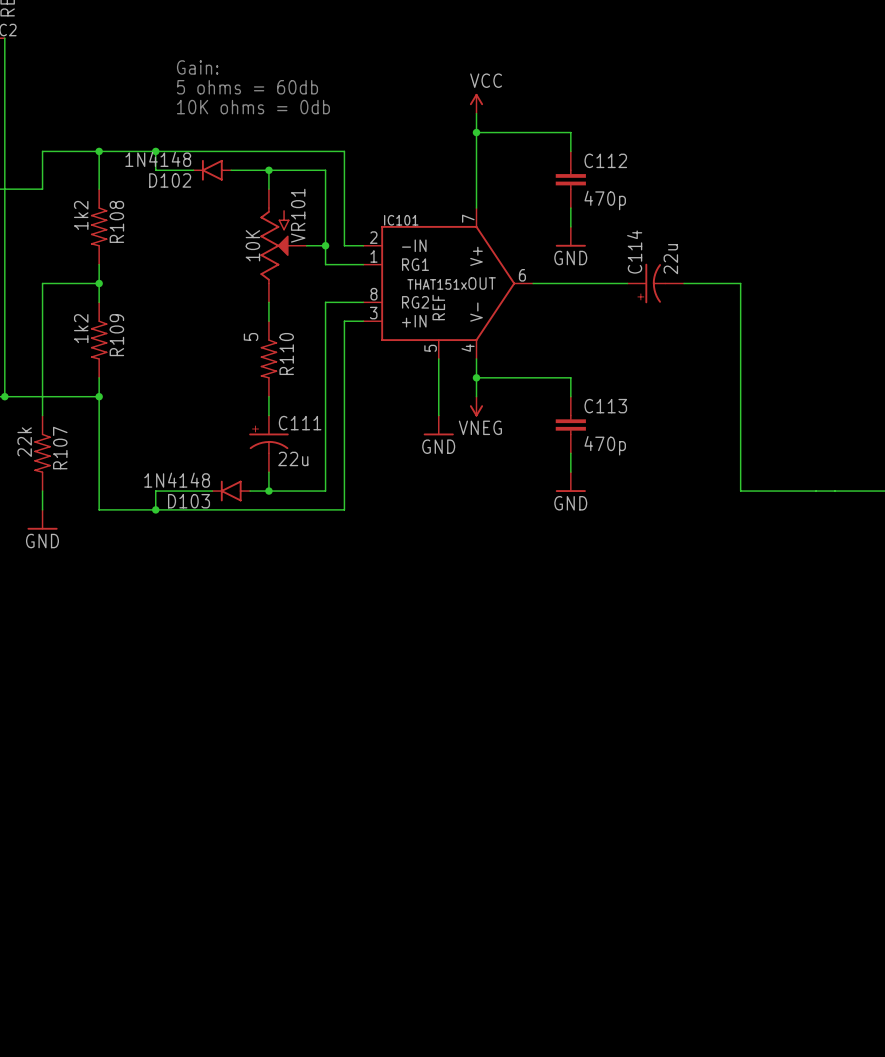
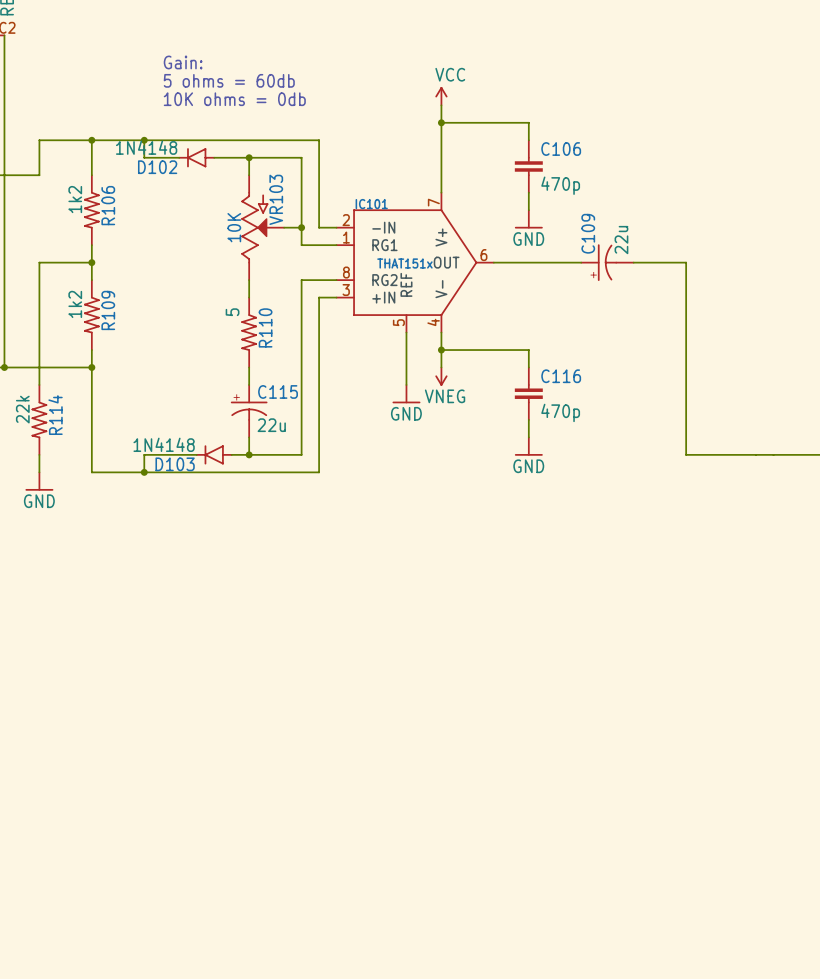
C112 name: C112 (605, 160) -> C106 (561, 149)
VR101 name: VR101 (298, 215) -> VR103 (276, 199)
R108 name: R108 (116, 221) -> R106 (108, 205)
C114 name: C114 (634, 252) -> C109 (588, 233)
C113 name: C113 (605, 406) -> C116 (561, 376)
C111 name: C111 (300, 423) -> C115 (278, 391)
R107 name: R107 (60, 448) -> R114 (55, 415)

